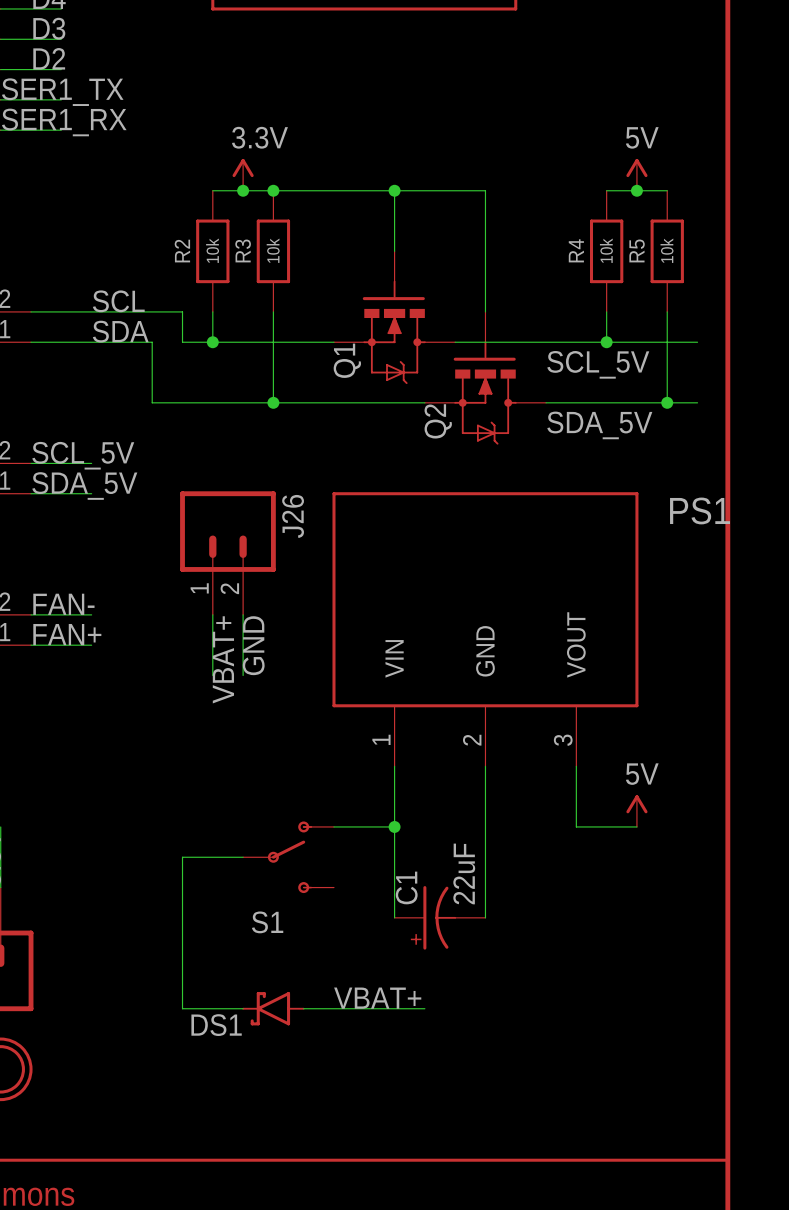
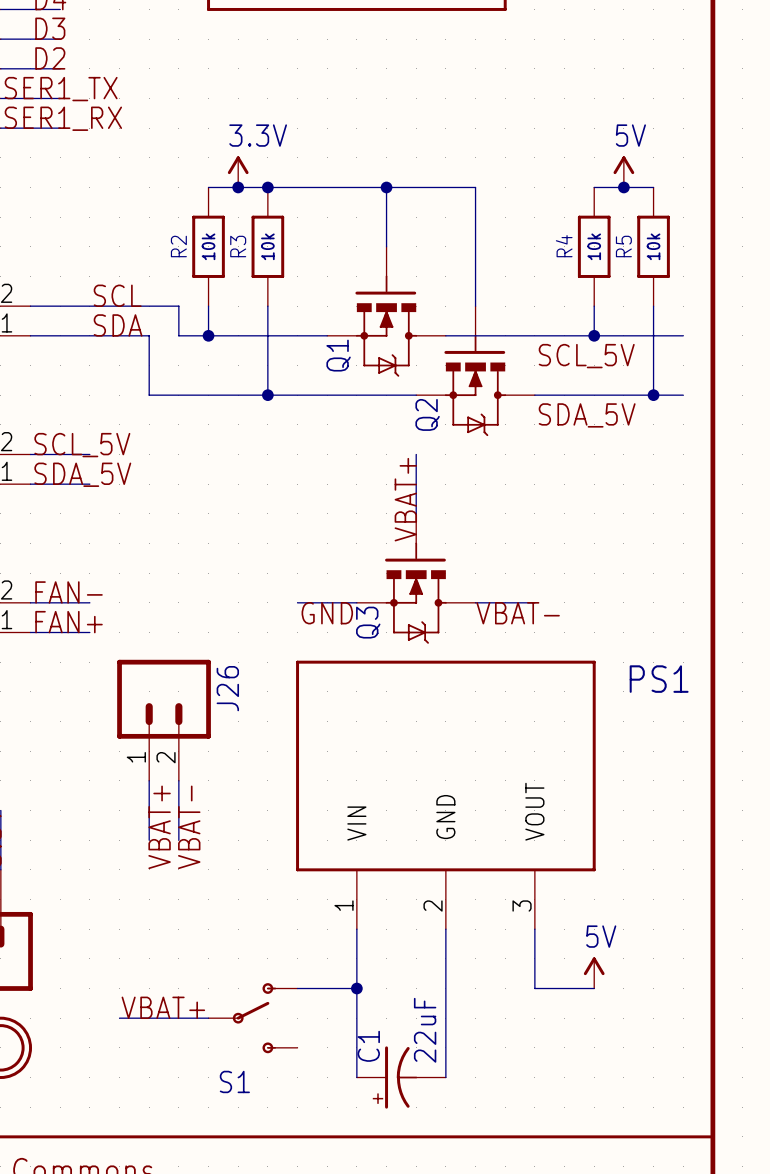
wire: none -> (416, 454) (416, 513)
label: none -> VBAT+ (405, 499)
J26 position: (227, 553) -> (164, 720)
Q3: none -> (416, 578)
wire: (212, 614) (212, 675) -> (178, 780) (178, 840)
wire: (243, 614) (243, 675) -> (149, 780) (149, 840)
wire: none -> (475, 602) (534, 602)
label: none -> VBAT- (518, 613)
PS1 position: (485, 629) -> (445, 794)
label rotation: 0° (253, 645) -> 90° clockwise (327, 613)
label position: GND (253, 645) -> GND (327, 613)
label: VBAT+ (223, 659) -> none
wire: (394, 766) (394, 917) -> (356, 929) (356, 1077)
wire: (485, 766) (485, 917) -> (445, 929) (445, 1077)
wire: (576, 766) (576, 826) (636, 826) -> (534, 929) (534, 988) (594, 988)
power symbol position: 5V (636, 811) -> 5V (594, 972)
wire: (333, 826) (394, 826) -> (297, 602) (356, 602)
junction: (394, 826) -> none
label: none -> VBAT- (189, 827)
label: none -> VBAT+ (159, 827)
wire: (243, 857) (182, 857) (182, 1008) (243, 1008) -> none
S1 position: (288, 857) -> (253, 1018)
C1 position: (440, 917) -> (401, 1077)
label: VBAT+ (377, 998) -> none
DS1: (273, 1008) -> none
wire: (364, 1008) (424, 1008) -> none
junction: none -> (356, 988)
label: none -> VBAT+ (163, 1007)
wire: none -> (119, 1018) (208, 1018)

